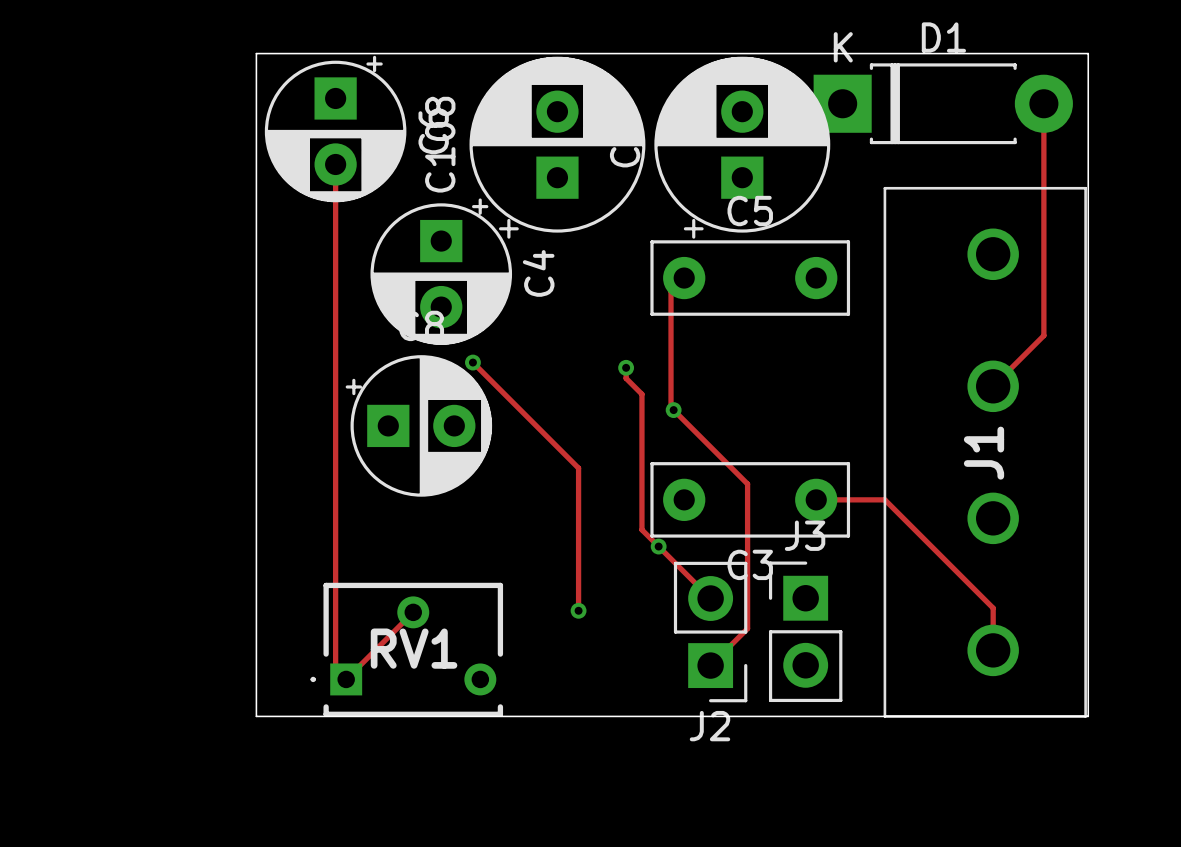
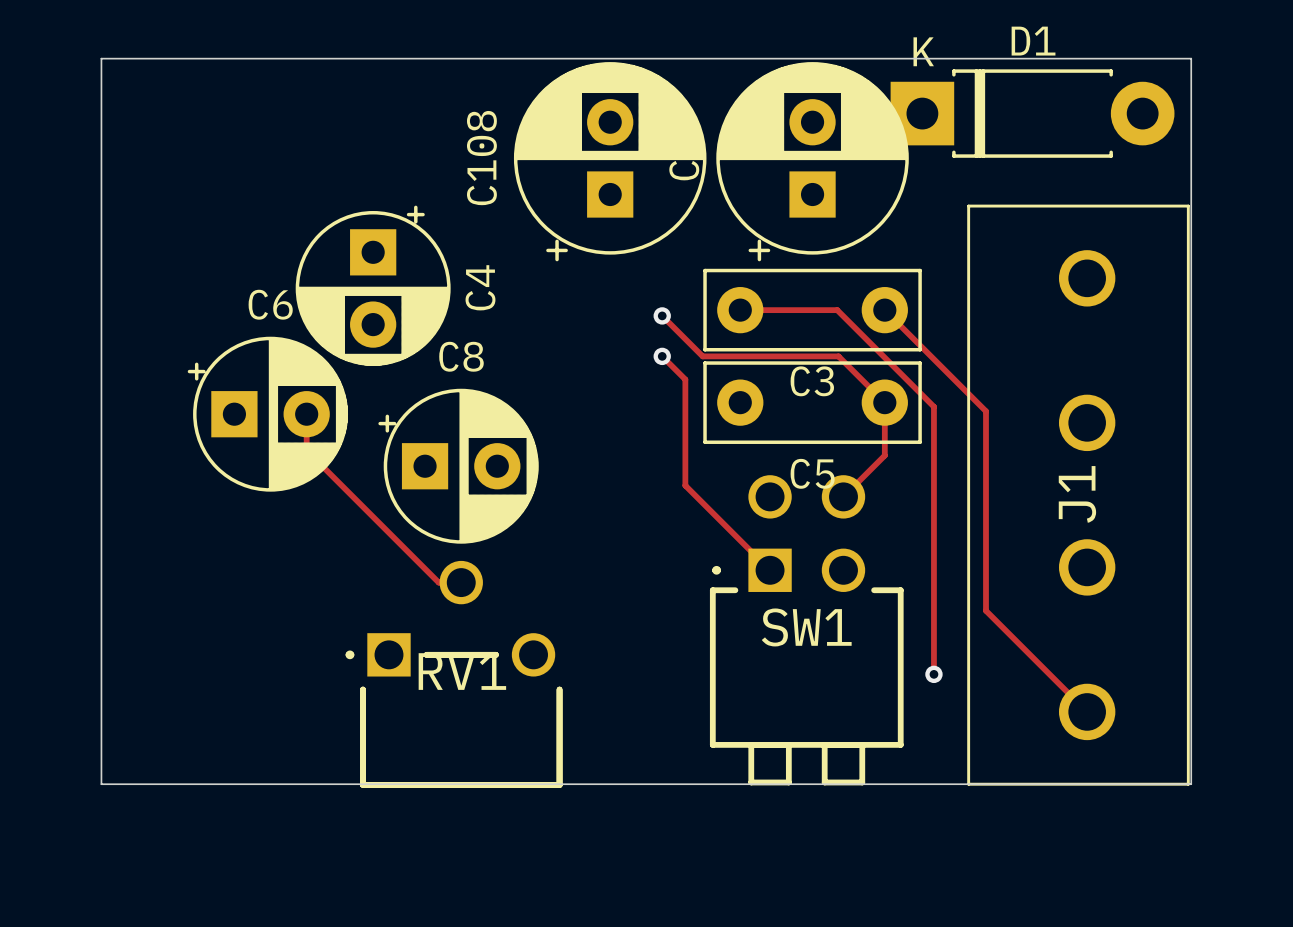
board edge: (256, 53) (256, 716) -> (280, 58) (101, 58) (101, 784) (280, 784)
track: (1043, 103) (1043, 335) (993, 386) -> none
C6 rotation: 0° (335, 129) -> 90° counterclockwise (267, 414)
C6 position: (335, 129) -> (267, 414)
track: (335, 164) (335, 668) (346, 679) (413, 612) -> none
C5 name position: C5 (750, 211) -> C5 (812, 473)
C4 position: (441, 271) -> (373, 285)
track: (684, 278) (671, 291) (671, 407) (747, 484) (747, 628) (710, 665) -> none
C5 position: (750, 278) -> (812, 402)
track: none -> (740, 310) (837, 310) (933, 406) (933, 674)
track: none -> (662, 315) (702, 356) (838, 356) (884, 402) (884, 455) (843, 496)
via: none -> (662, 315)
track: none -> (662, 356) (685, 379) (685, 402)
via: none -> (662, 356)
track: (472, 362) (578, 468) (578, 610) -> none
via: (472, 362) -> none
via: (626, 367) -> none
track: none -> (306, 414) (306, 450) (438, 582) (461, 582)
track: (626, 378) (641, 394) (641, 529) (710, 598) -> (685, 414) (685, 485) (770, 570)
via: (673, 410) -> none
C3 position: (750, 499) -> (812, 310)
track: (816, 499) (884, 499) (993, 608) (993, 650) -> (884, 310) (985, 411) (985, 610) (1087, 711)
via: (658, 546) -> none
SW1: none -> (806, 630)
RV1 footprint: [310, 582, 504, 717] -> [345, 560, 563, 788]
via: (578, 610) -> none
via: none -> (933, 674)
J3: (805, 631) -> none
J2: (710, 632) -> none

